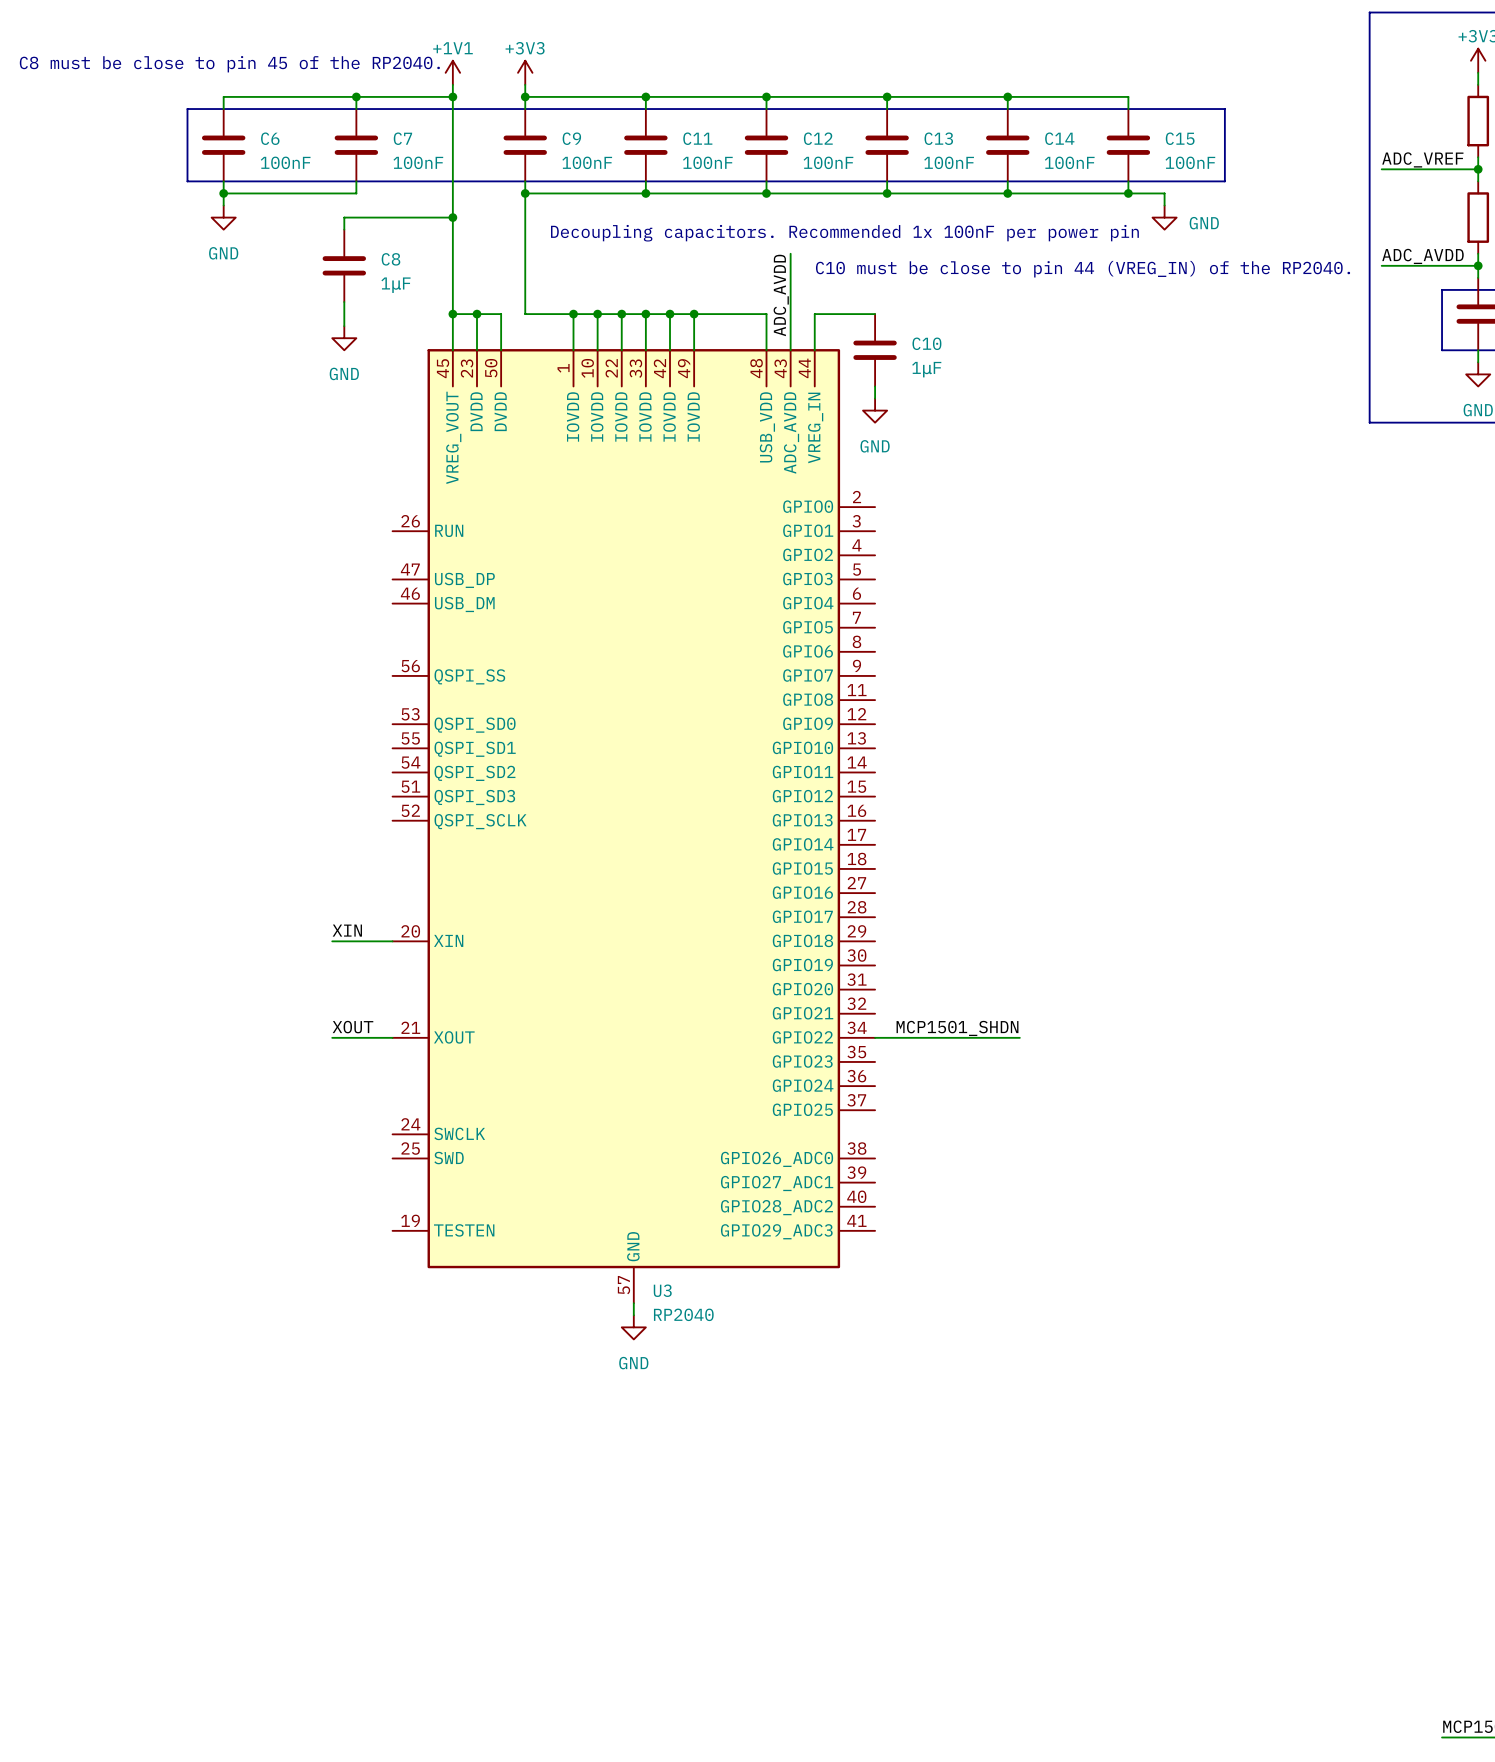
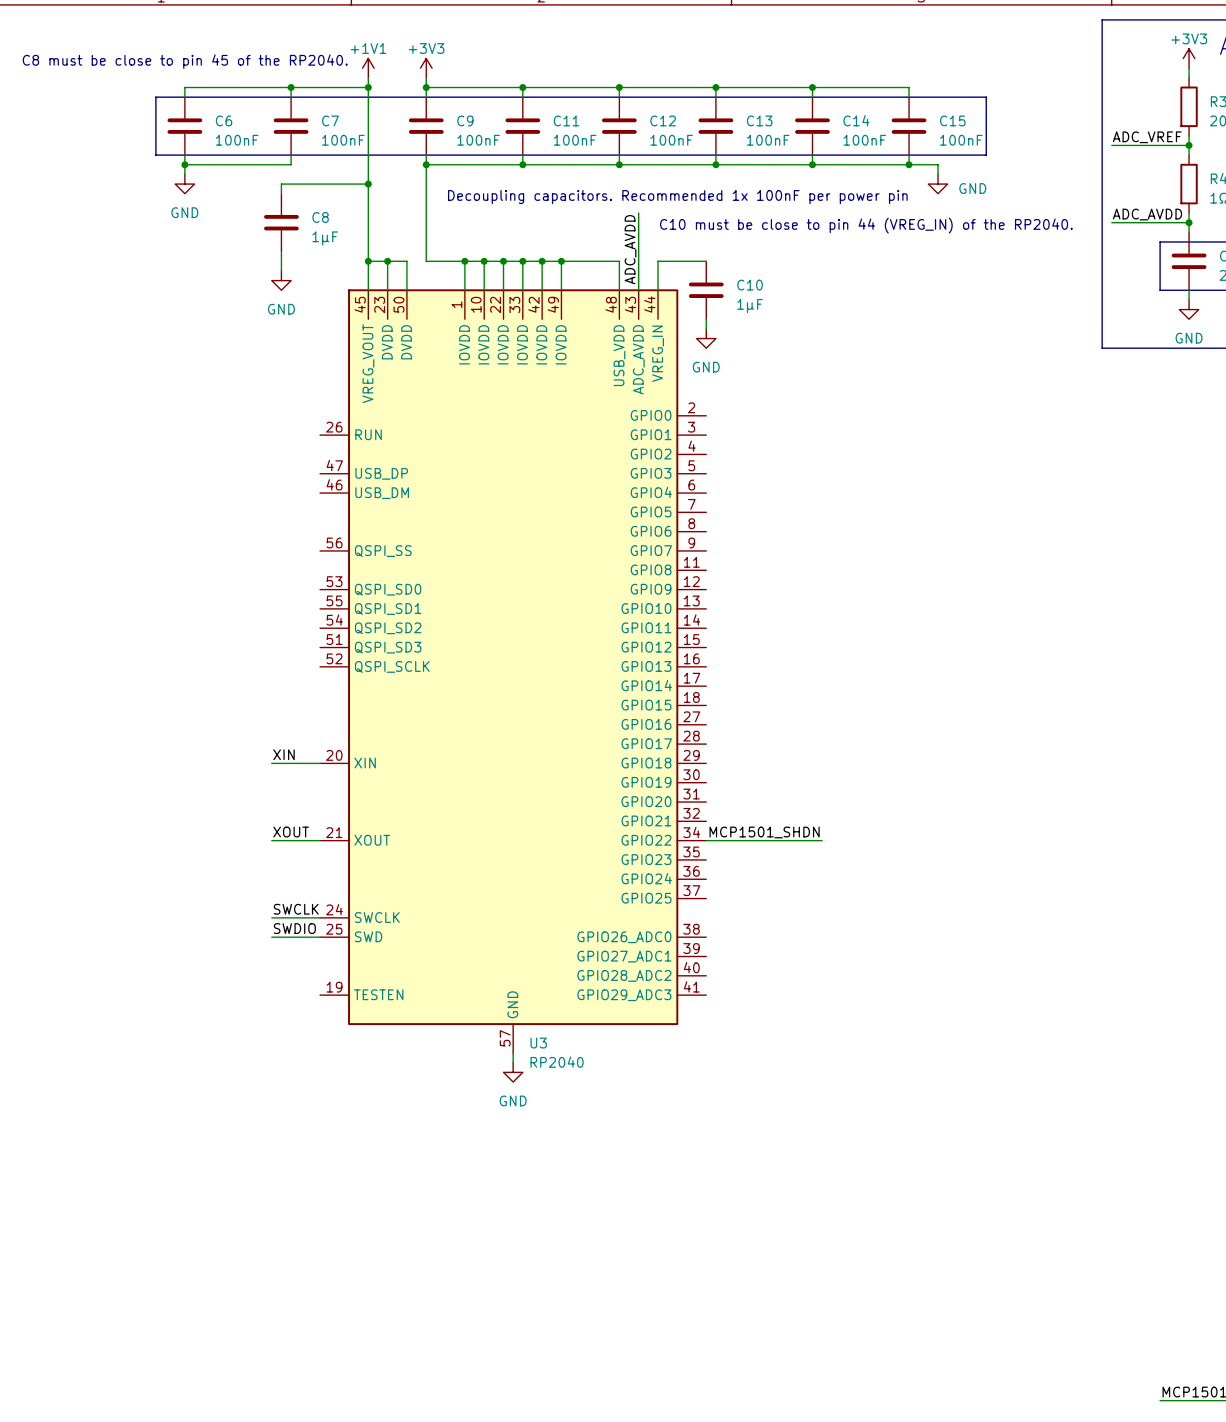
label: none -> SWCLK (296, 909)
wire: none -> (271, 917) (320, 917)
label: none -> SWDIO (294, 928)
wire: none -> (271, 937) (320, 937)

